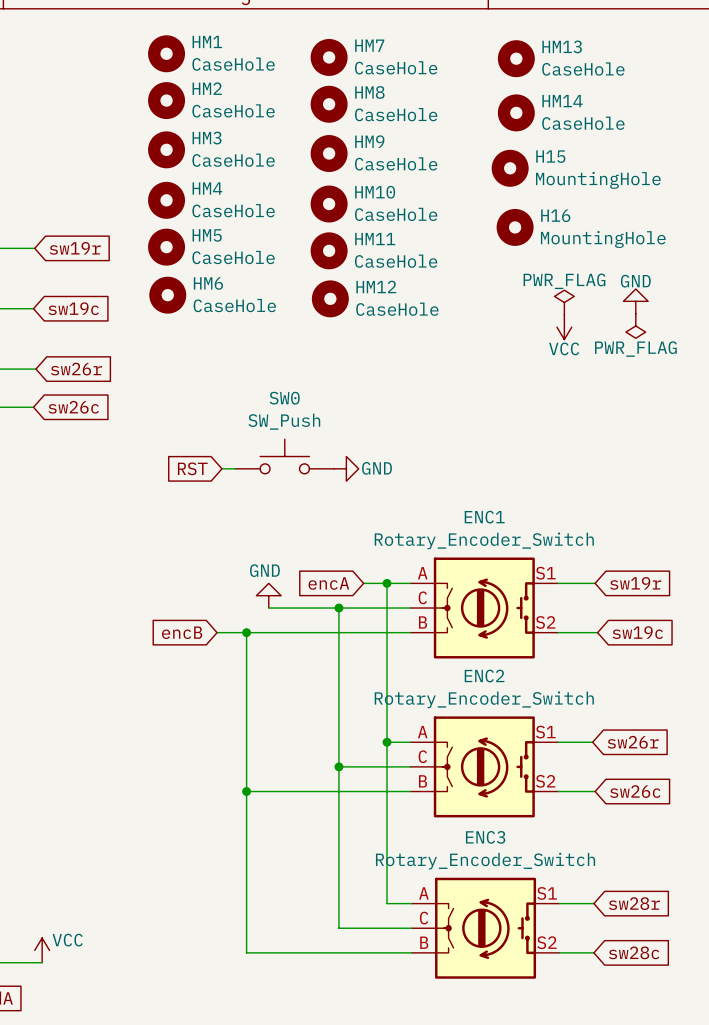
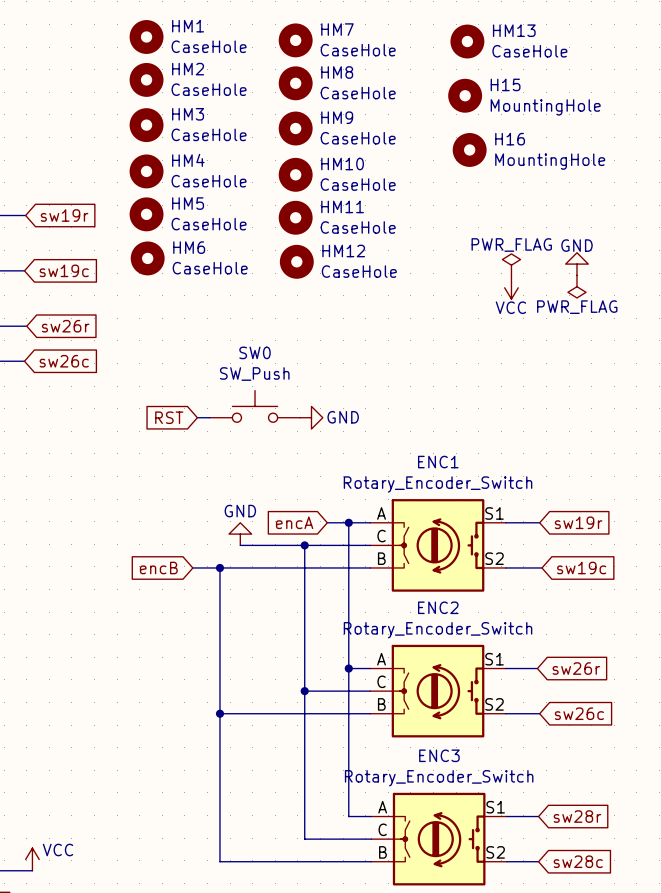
HM14: CaseHole (516, 112) -> none
H15 position: (510, 168) -> (465, 95)
H16 position: (515, 227) -> (469, 149)

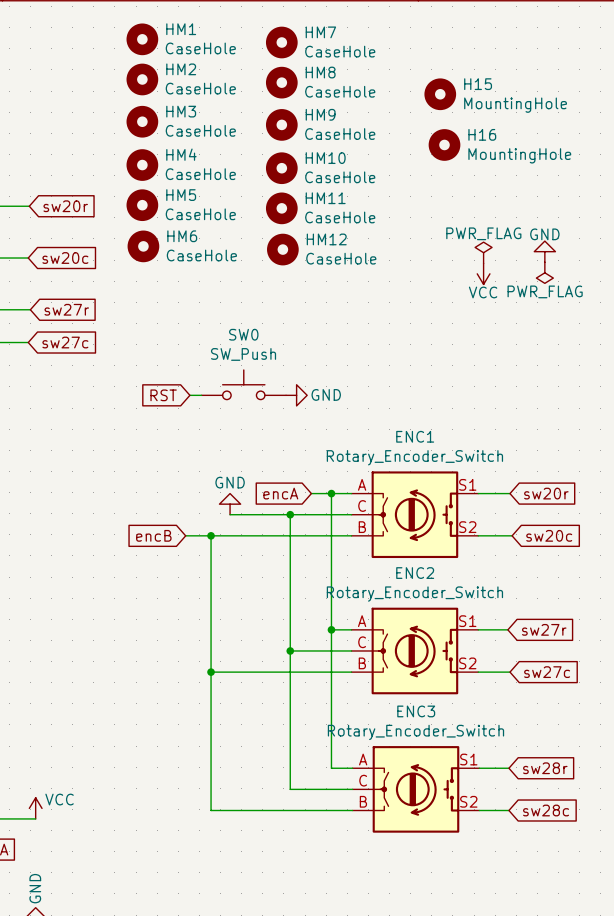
HM13: CaseHole (467, 41) -> none
global label: sw19r (64, 215) -> sw20r (65, 206)
global label: sw19c (64, 270) -> sw20c (65, 258)
global label: sw26r (65, 326) -> sw27r (66, 309)
global label: sw26c (64, 361) -> sw27c (65, 342)
global label: sw19r (578, 522) -> sw20r (546, 493)
global label: sw19c (581, 567) -> sw20c (549, 535)
global label: sw26r (576, 668) -> sw27r (544, 629)
global label: sw26c (579, 713) -> sw27c (547, 672)

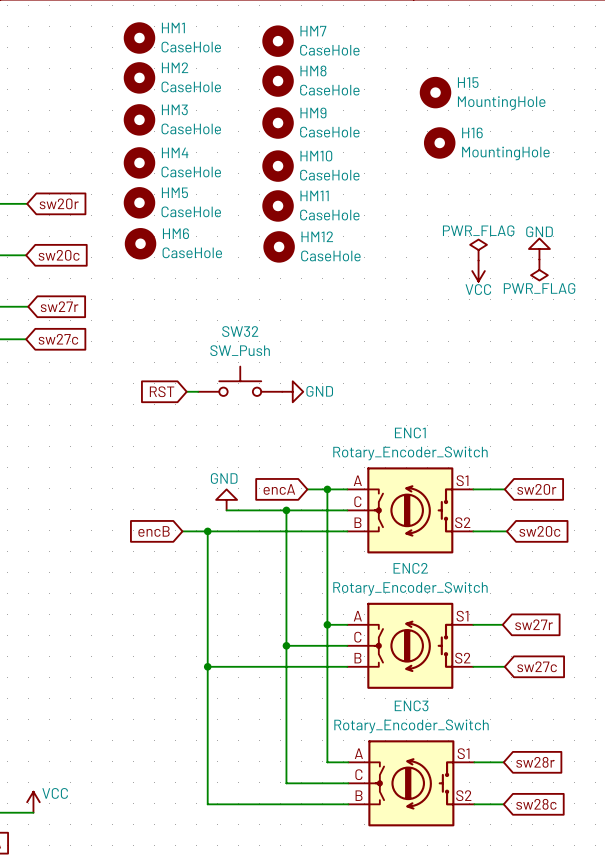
SW0 name: SW0 (243, 334) -> SW32 (240, 331)

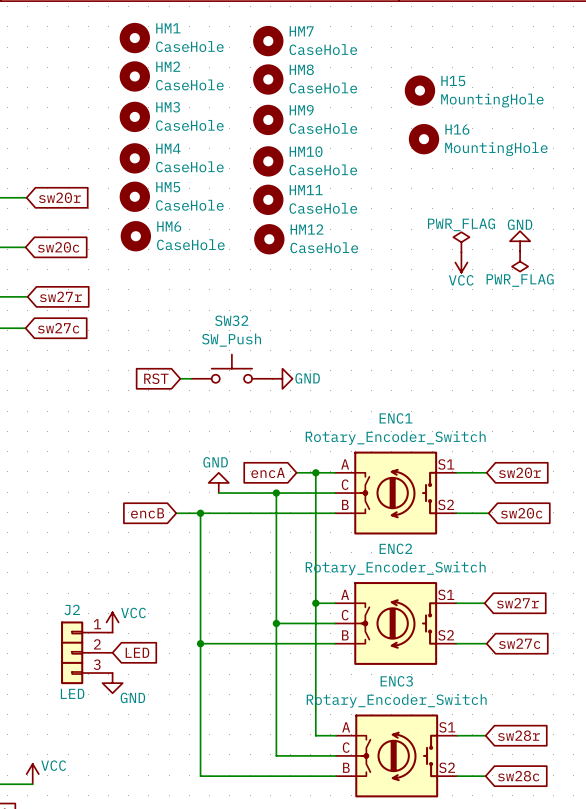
power symbol: none -> VCC (112, 622)
J2: none -> LED (86, 652)
global label: none -> LED (137, 652)
power symbol: none -> GND (112, 683)

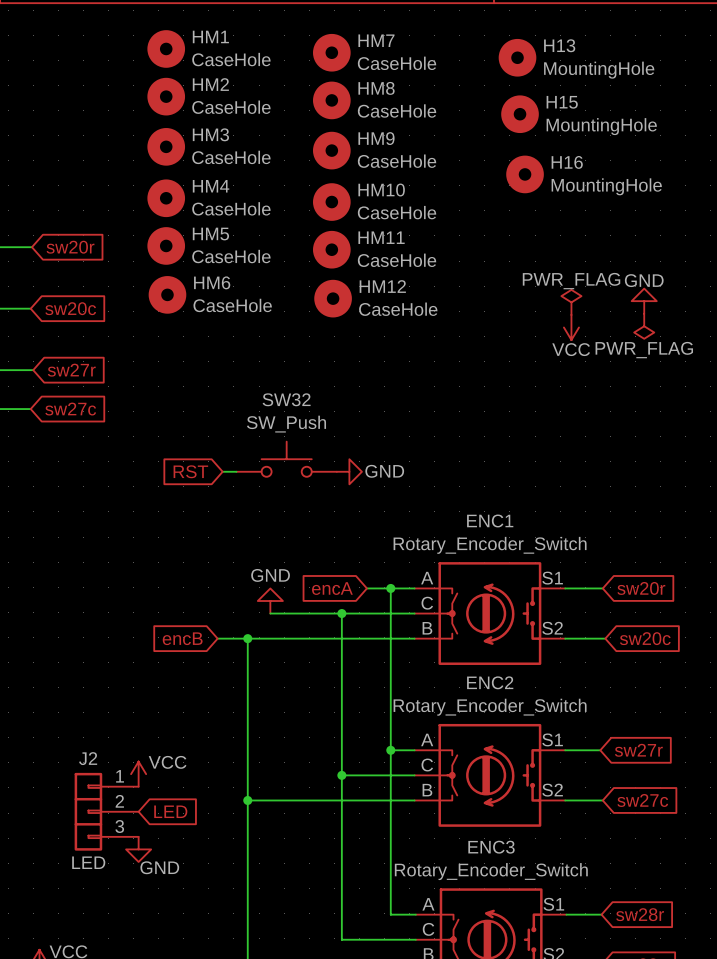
H13: none -> MountingHole (517, 57)

